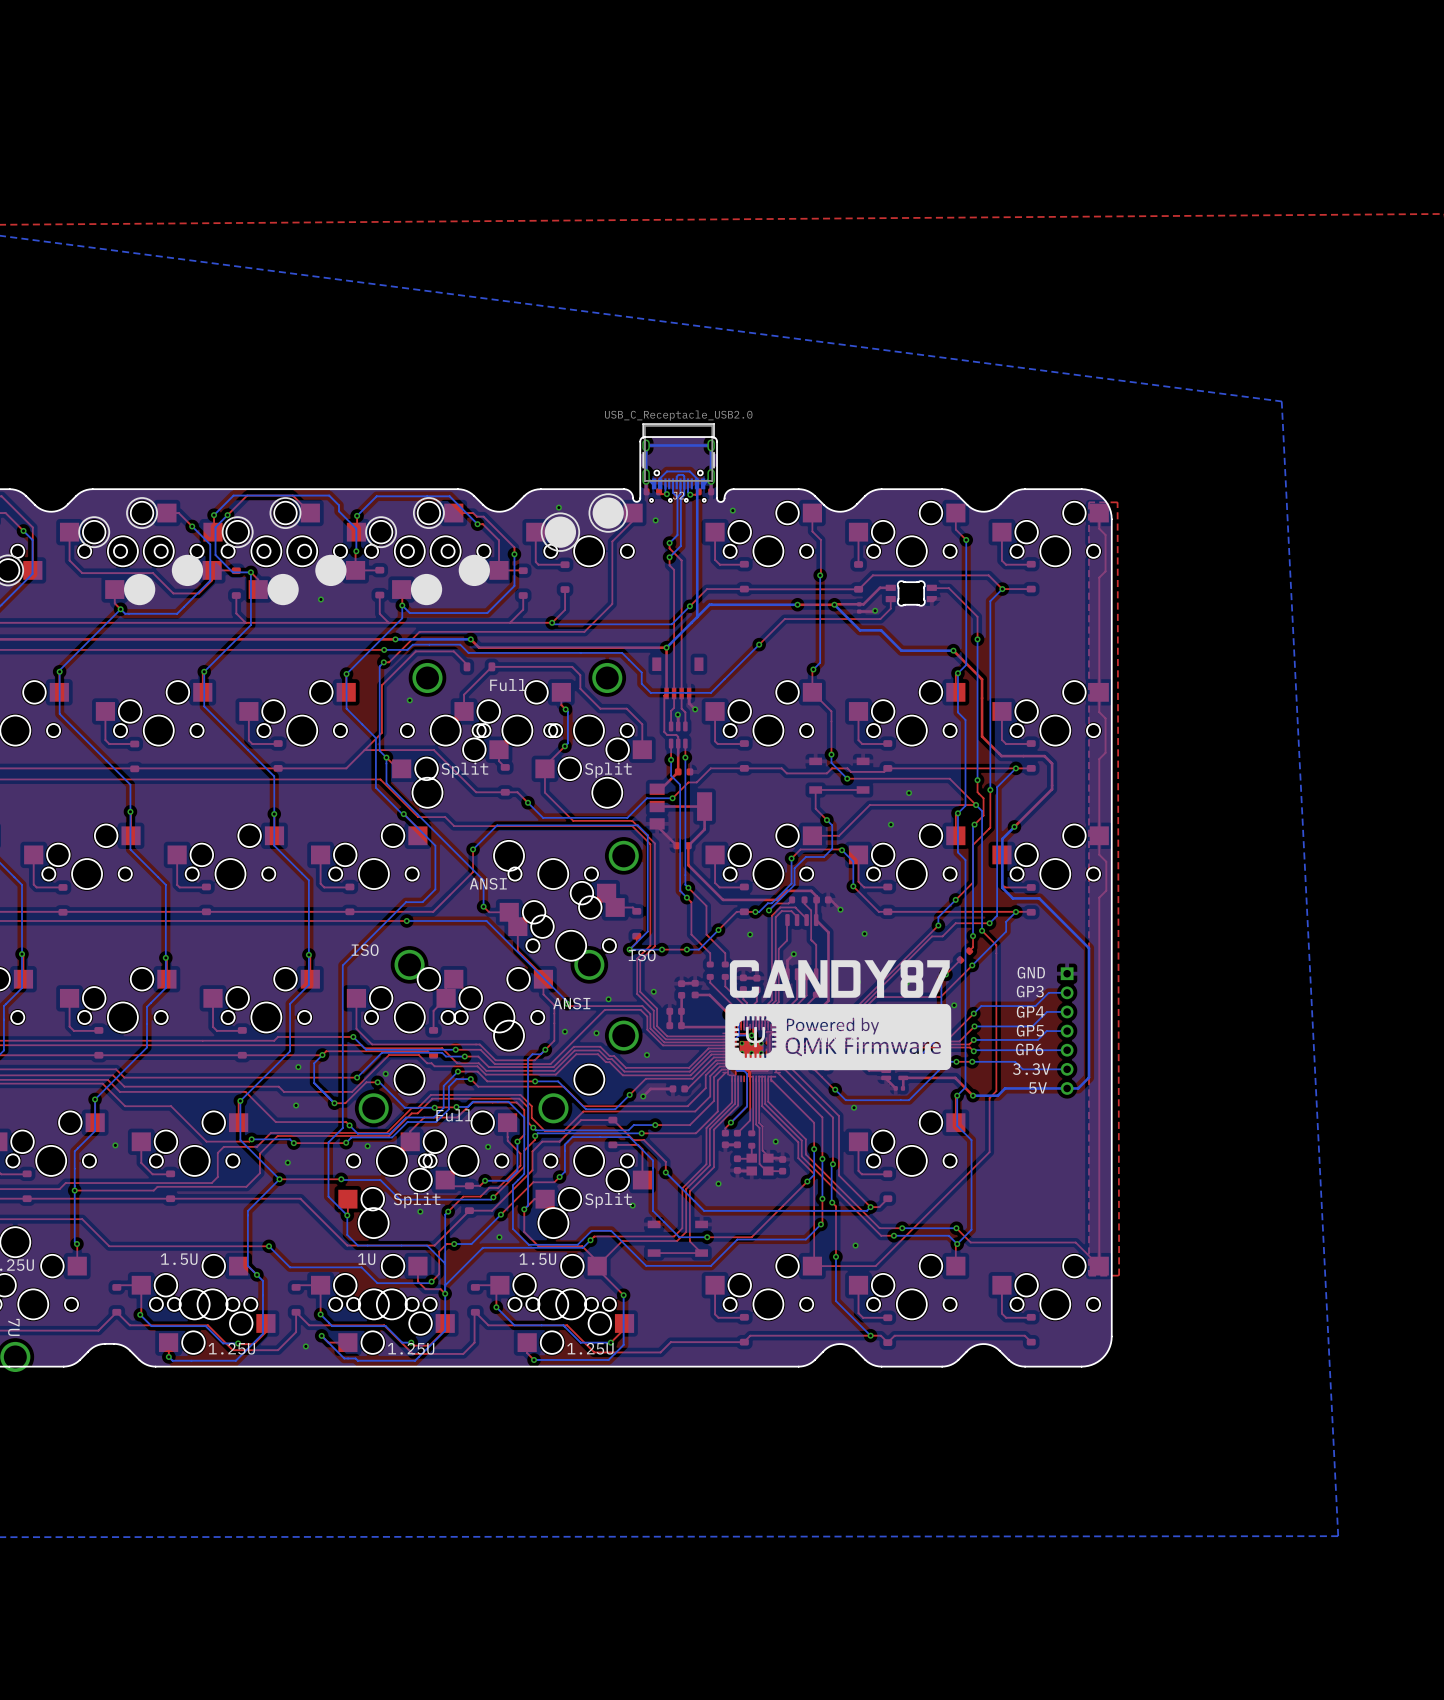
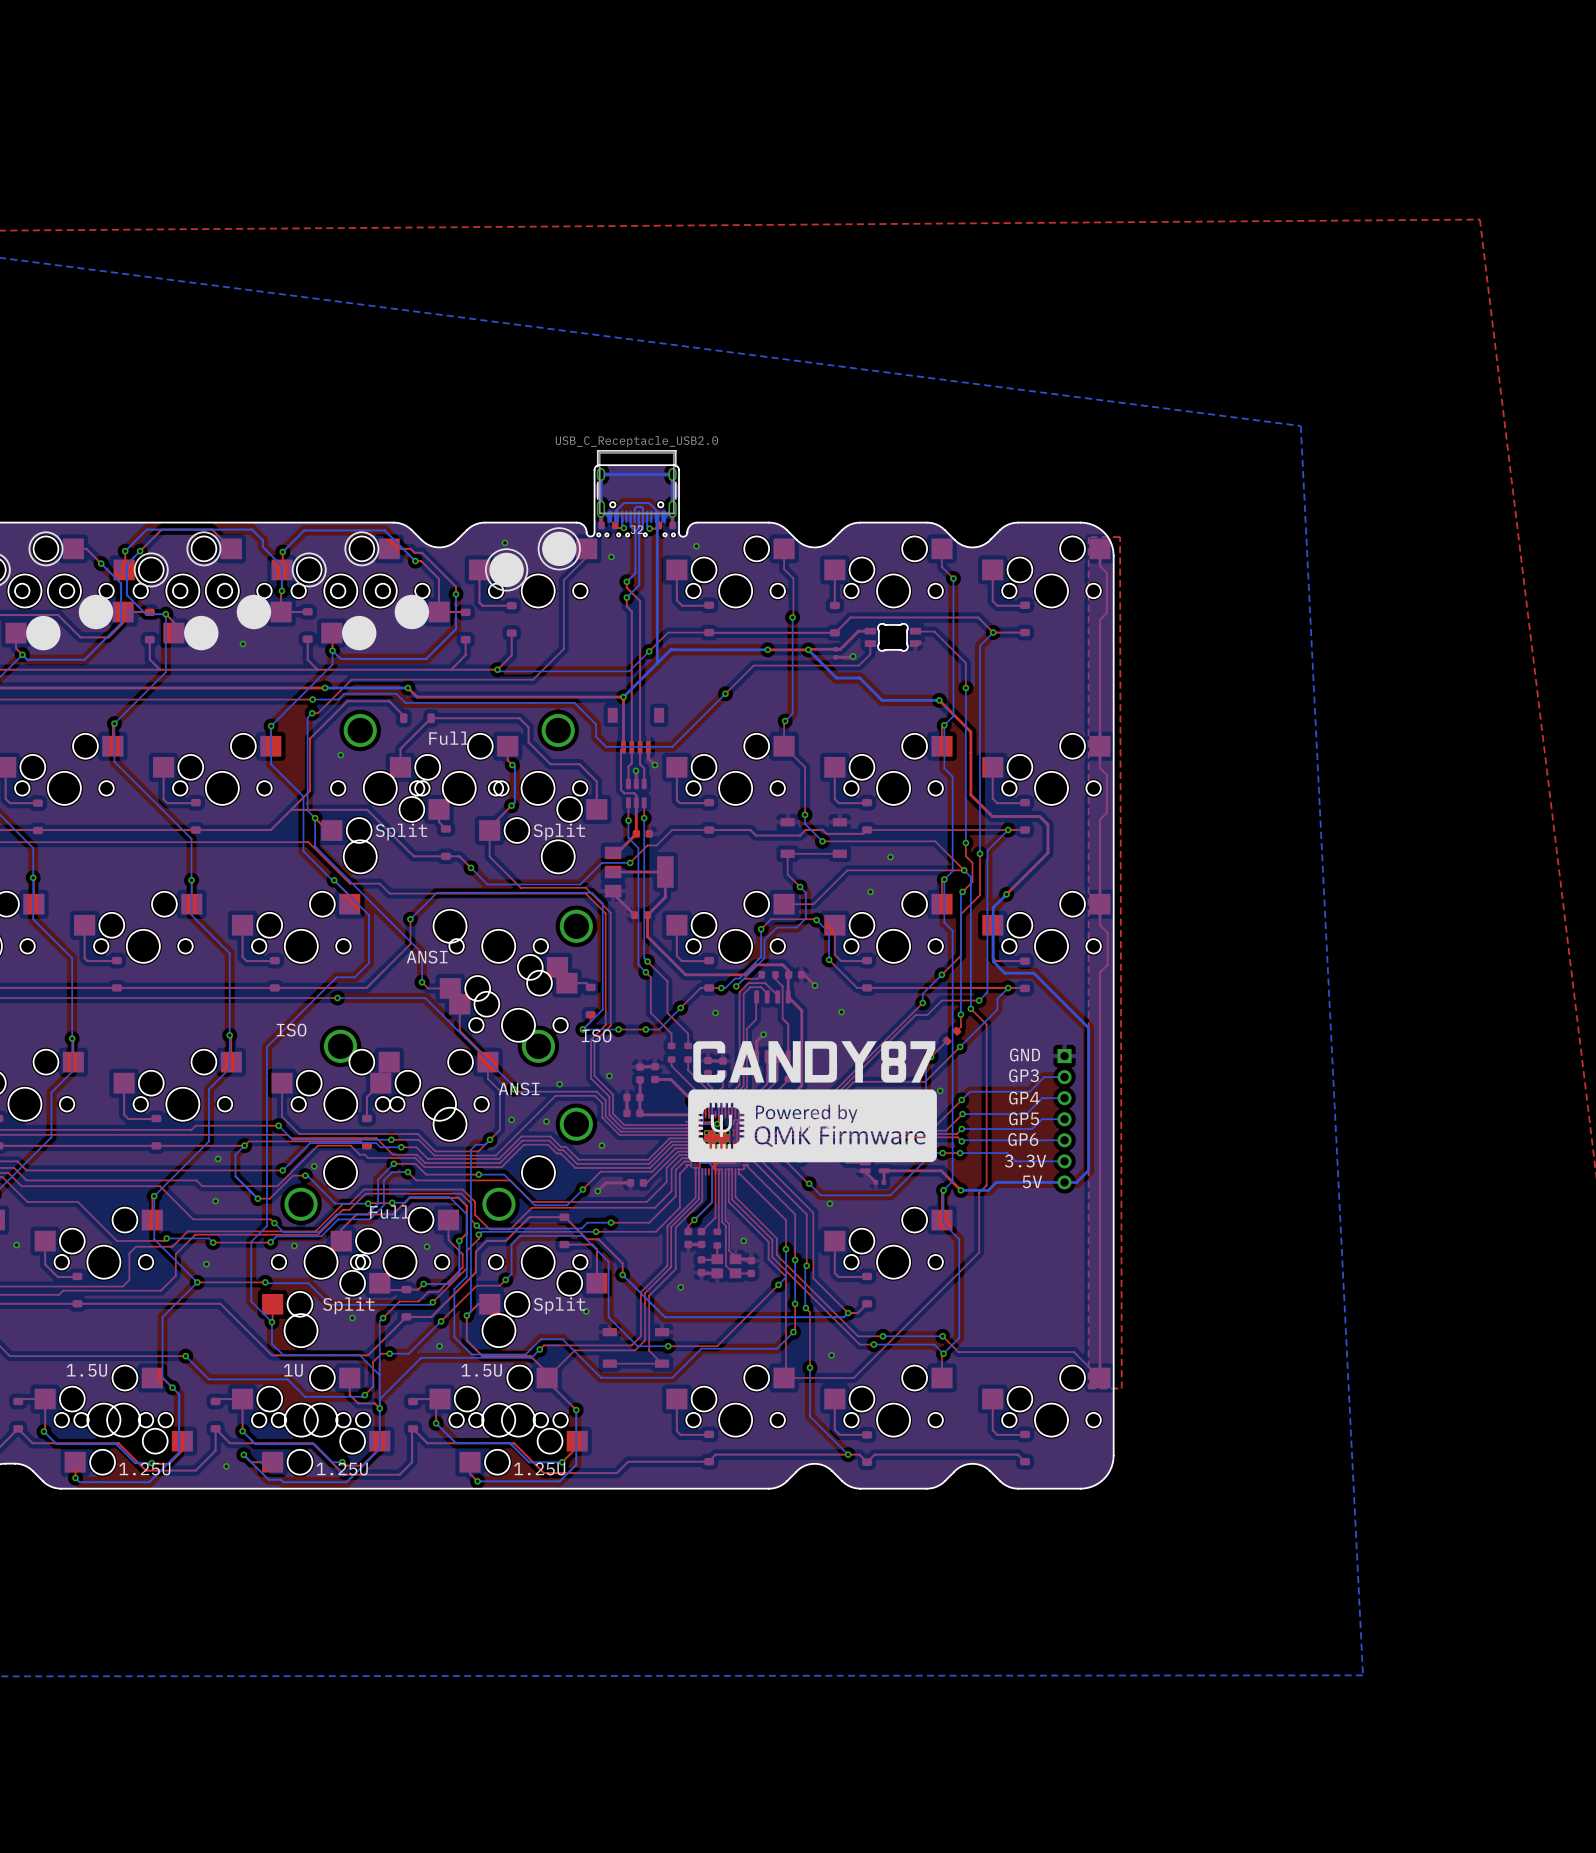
part: none -> (598, 534)
part: none -> (618, 534)
part: none -> (673, 534)

